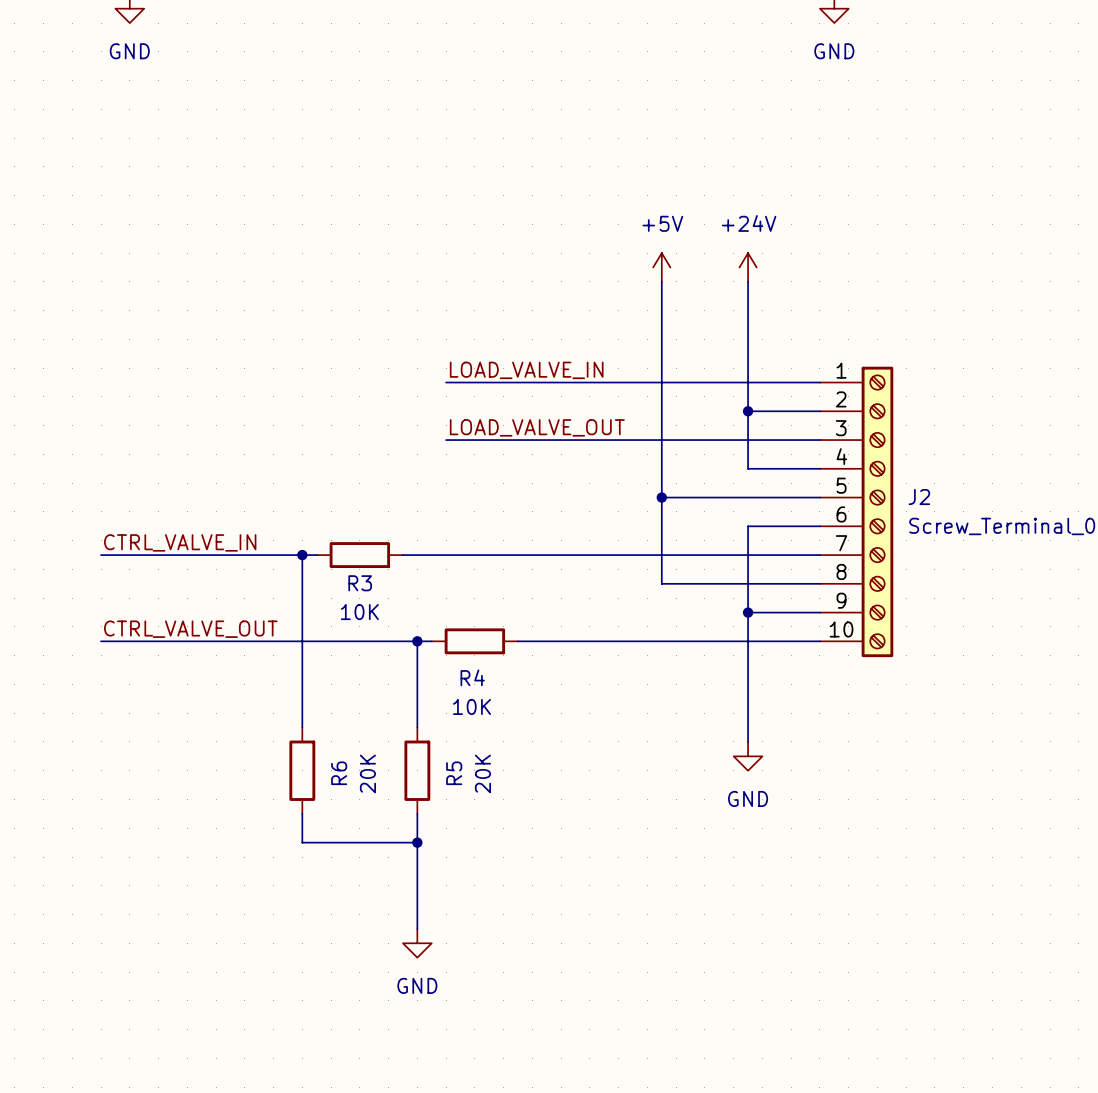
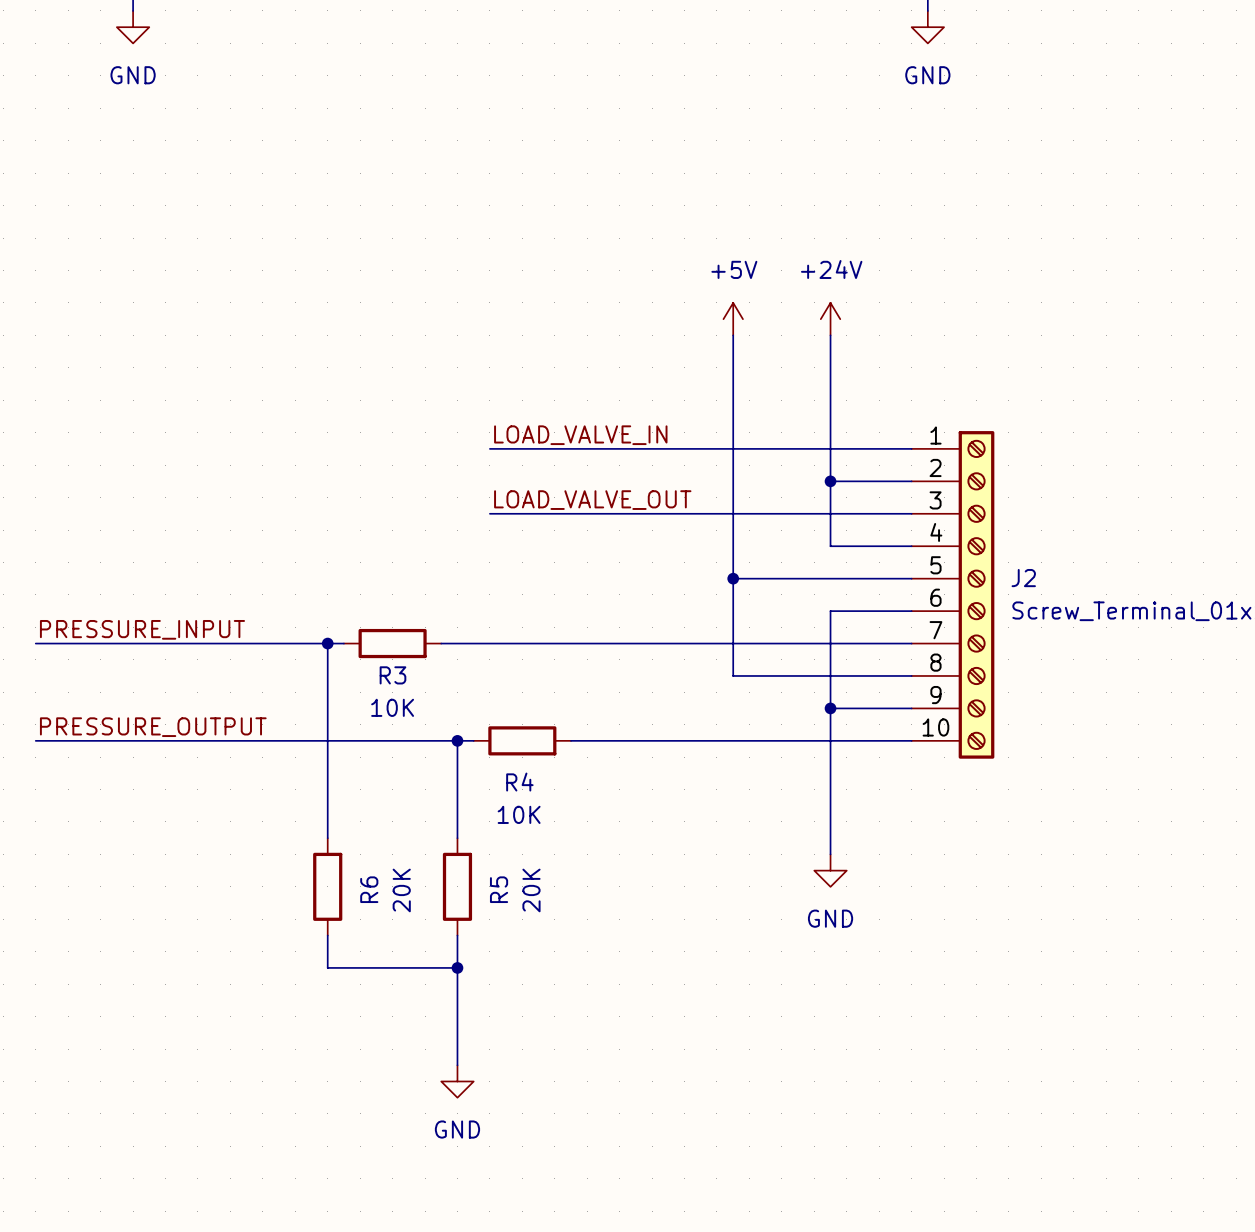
label: none -> PRESSURE_INPUT (142, 629)
label: CTRL_VALVE_IN (180, 542) -> none
wire: none -> (35, 643) (100, 643)
label: none -> PRESSURE_OUTPUT (153, 727)
label: CTRL_VALVE_OUT (190, 629) -> none
wire: none -> (35, 740) (100, 740)

